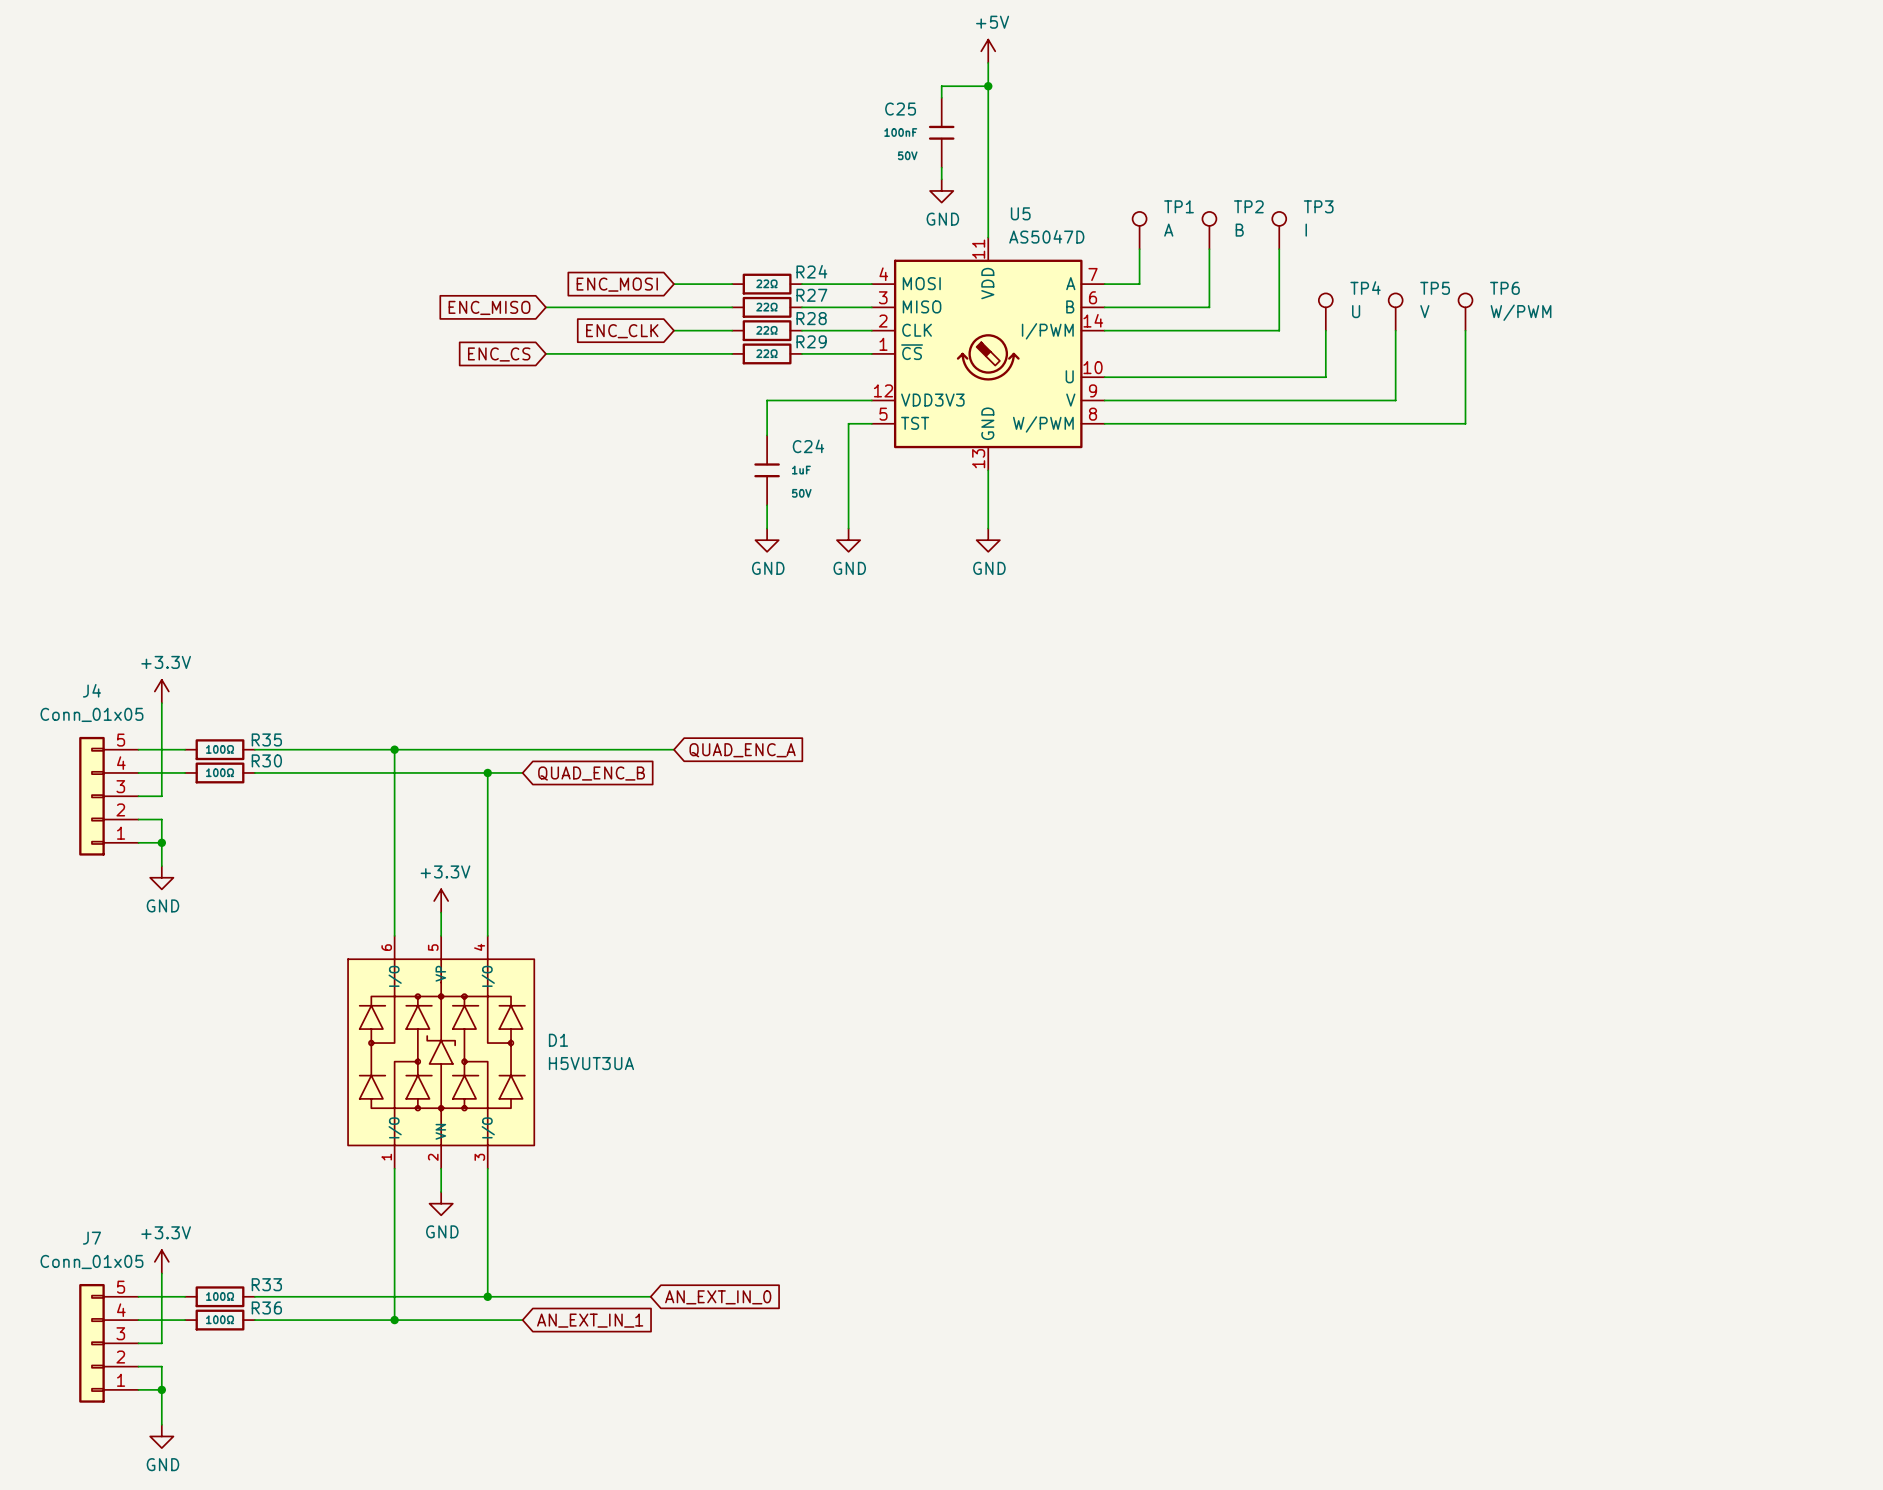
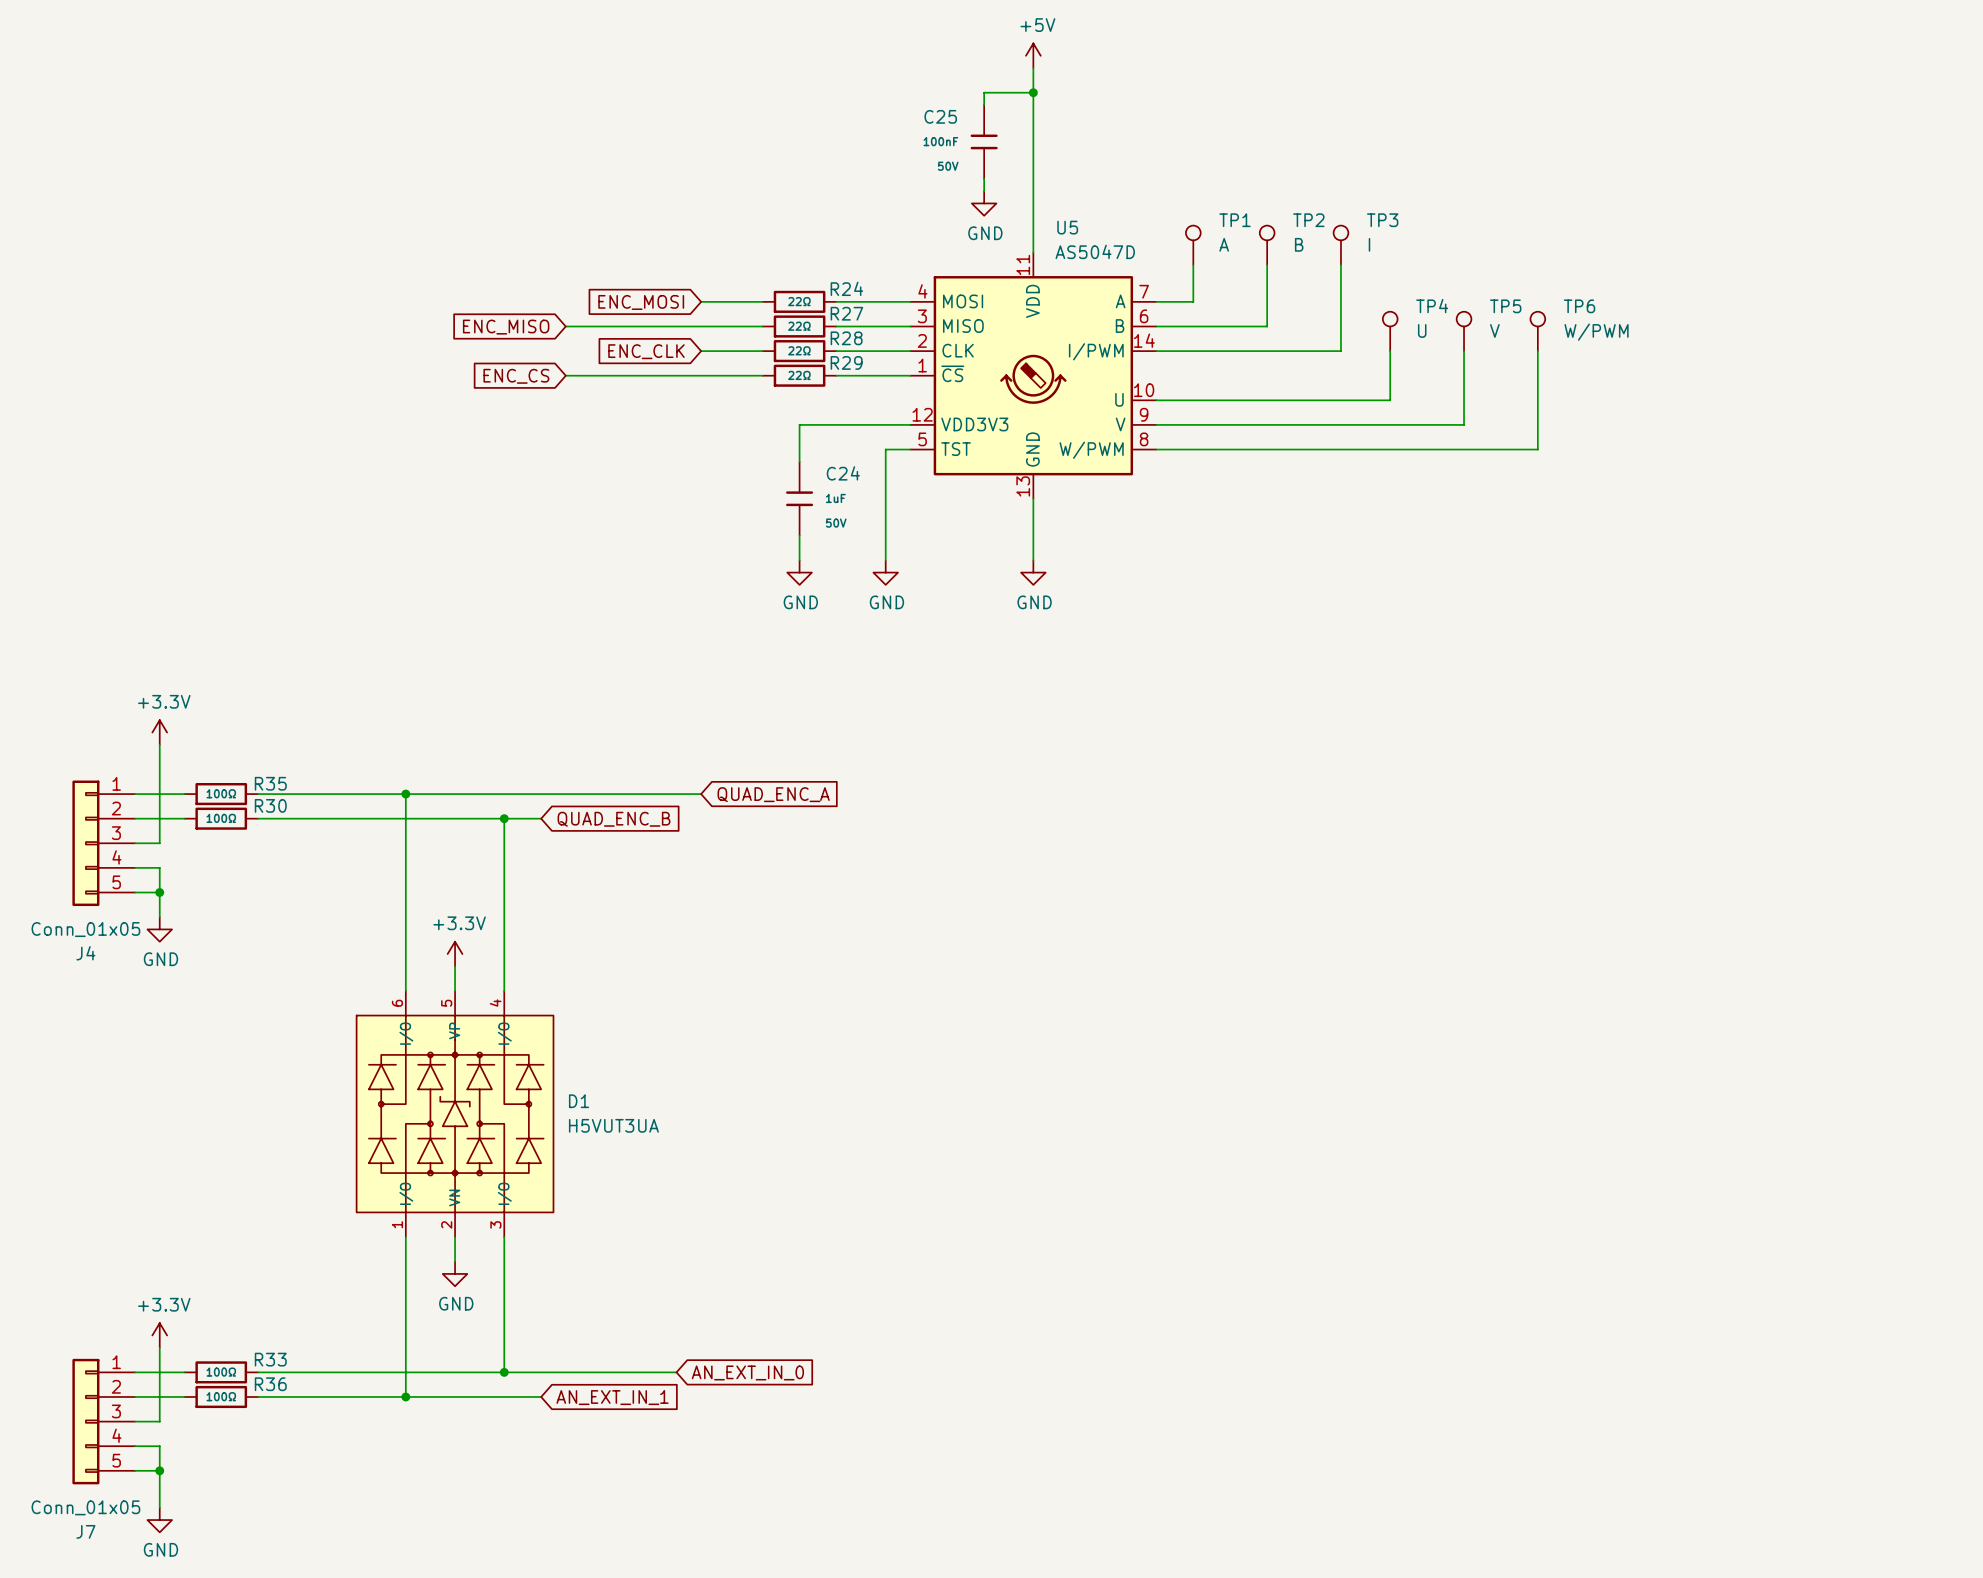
J4 flip: as is (91, 796) -> up-down (85, 843)
J7 flip: as is (91, 1343) -> up-down (85, 1421)

